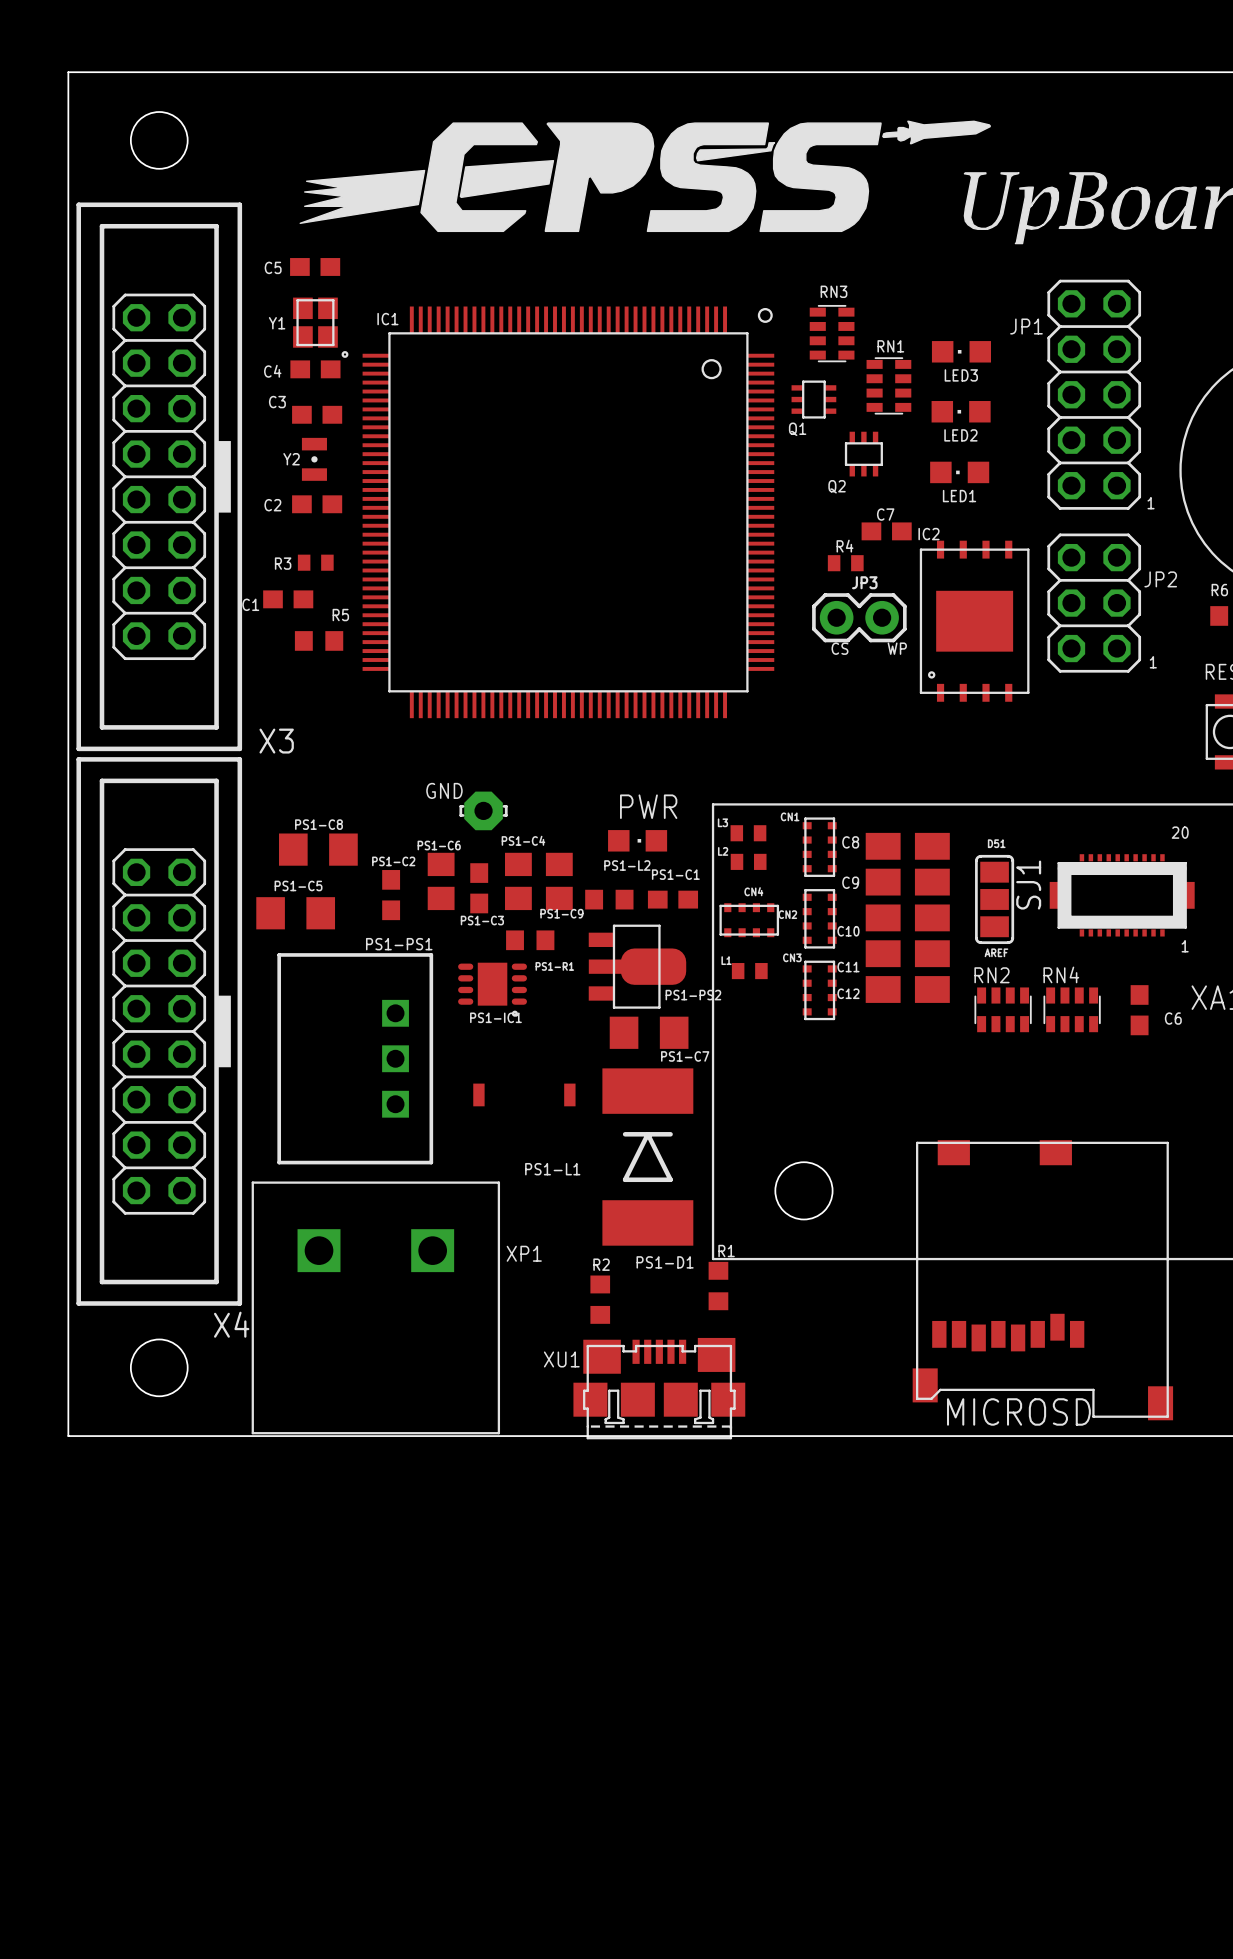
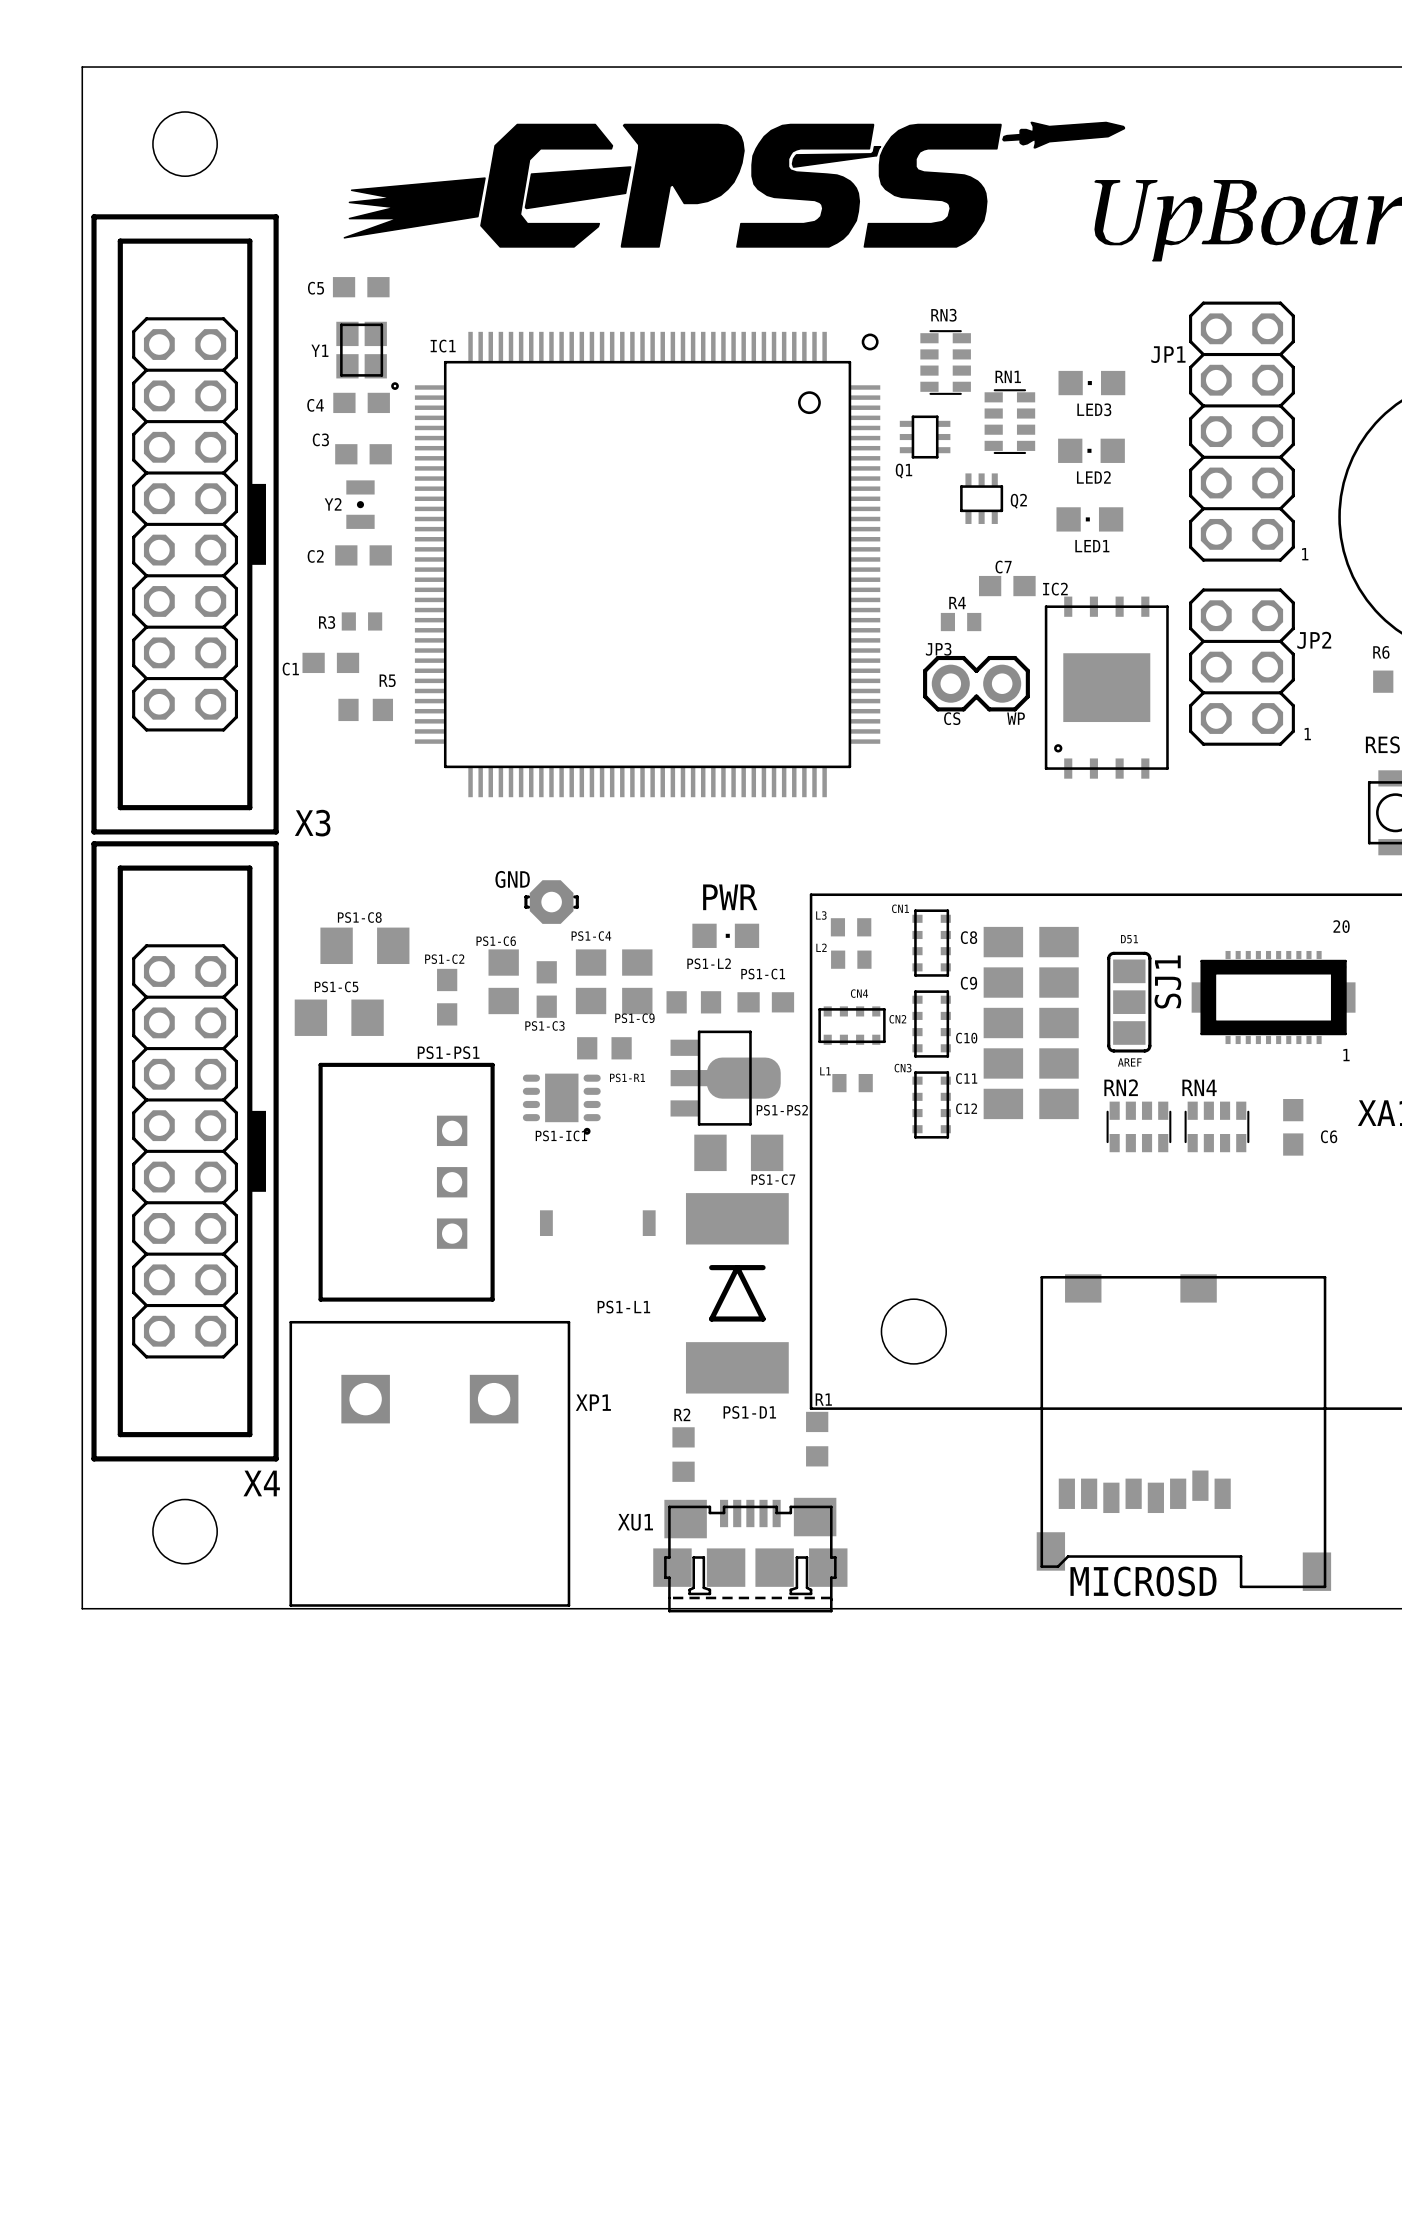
Q2 name position: Q2 (837, 486) -> Q2 (1018, 501)
JP3 name position: JP3 (864, 582) -> JP3 (938, 649)

